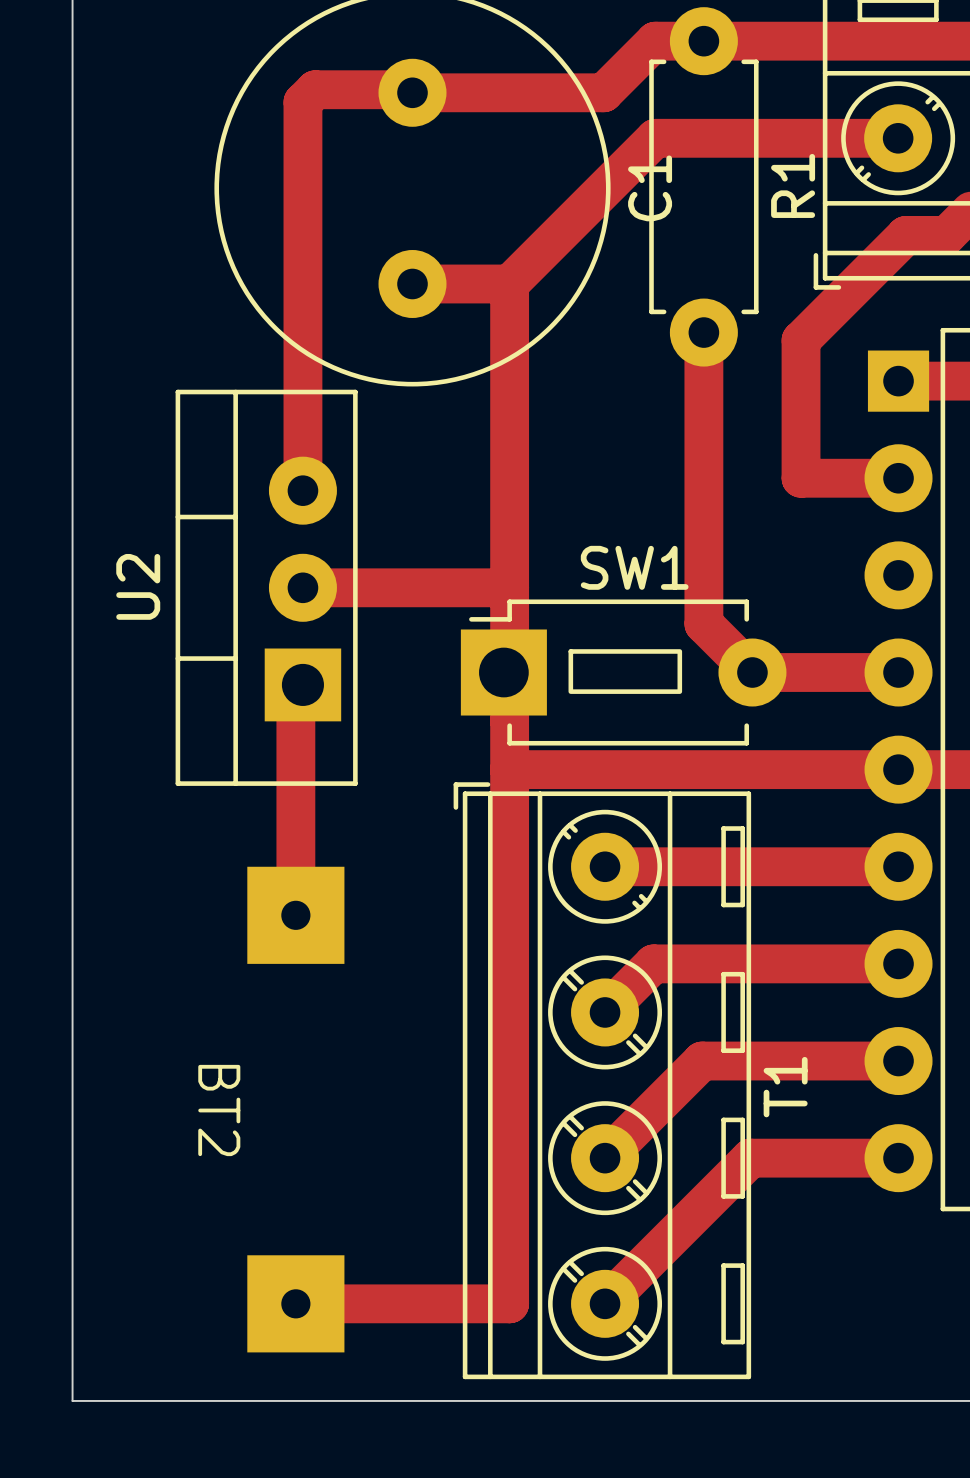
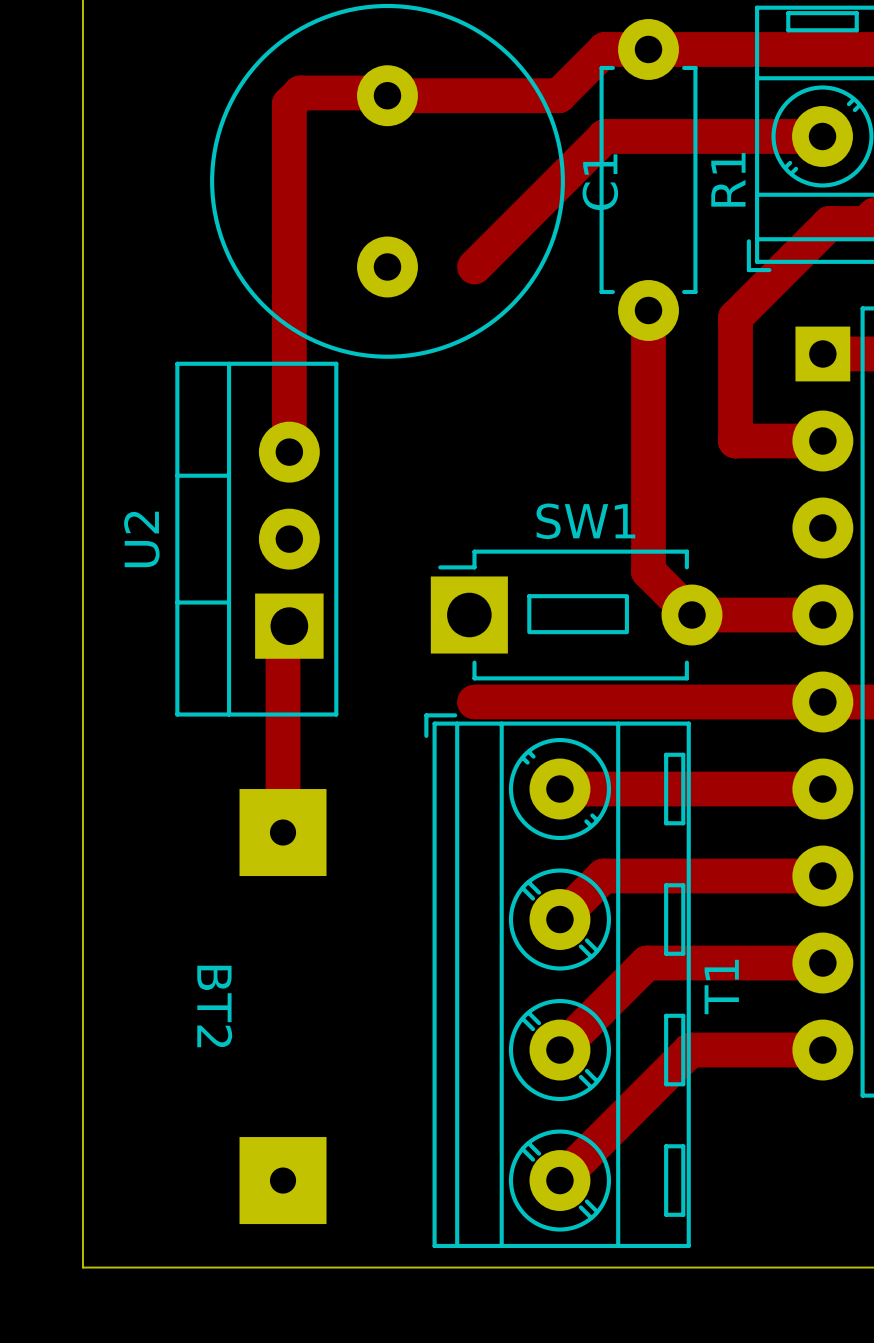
top track: (412, 283) (509, 283) (509, 1303) (295, 1303) -> none
top track: (302, 587) (509, 587) -> none

